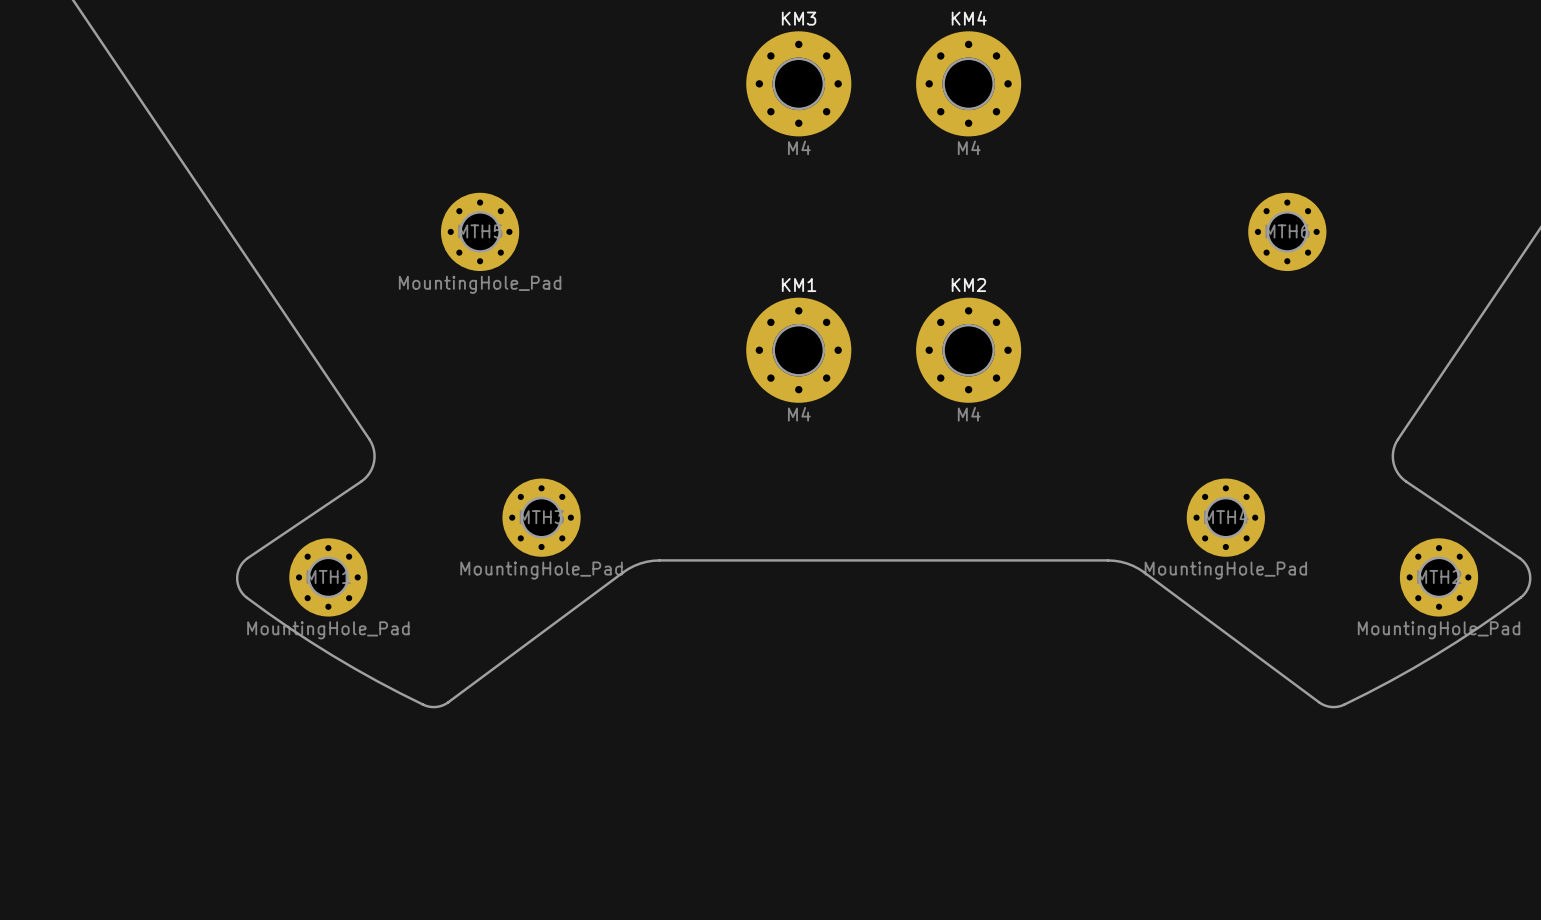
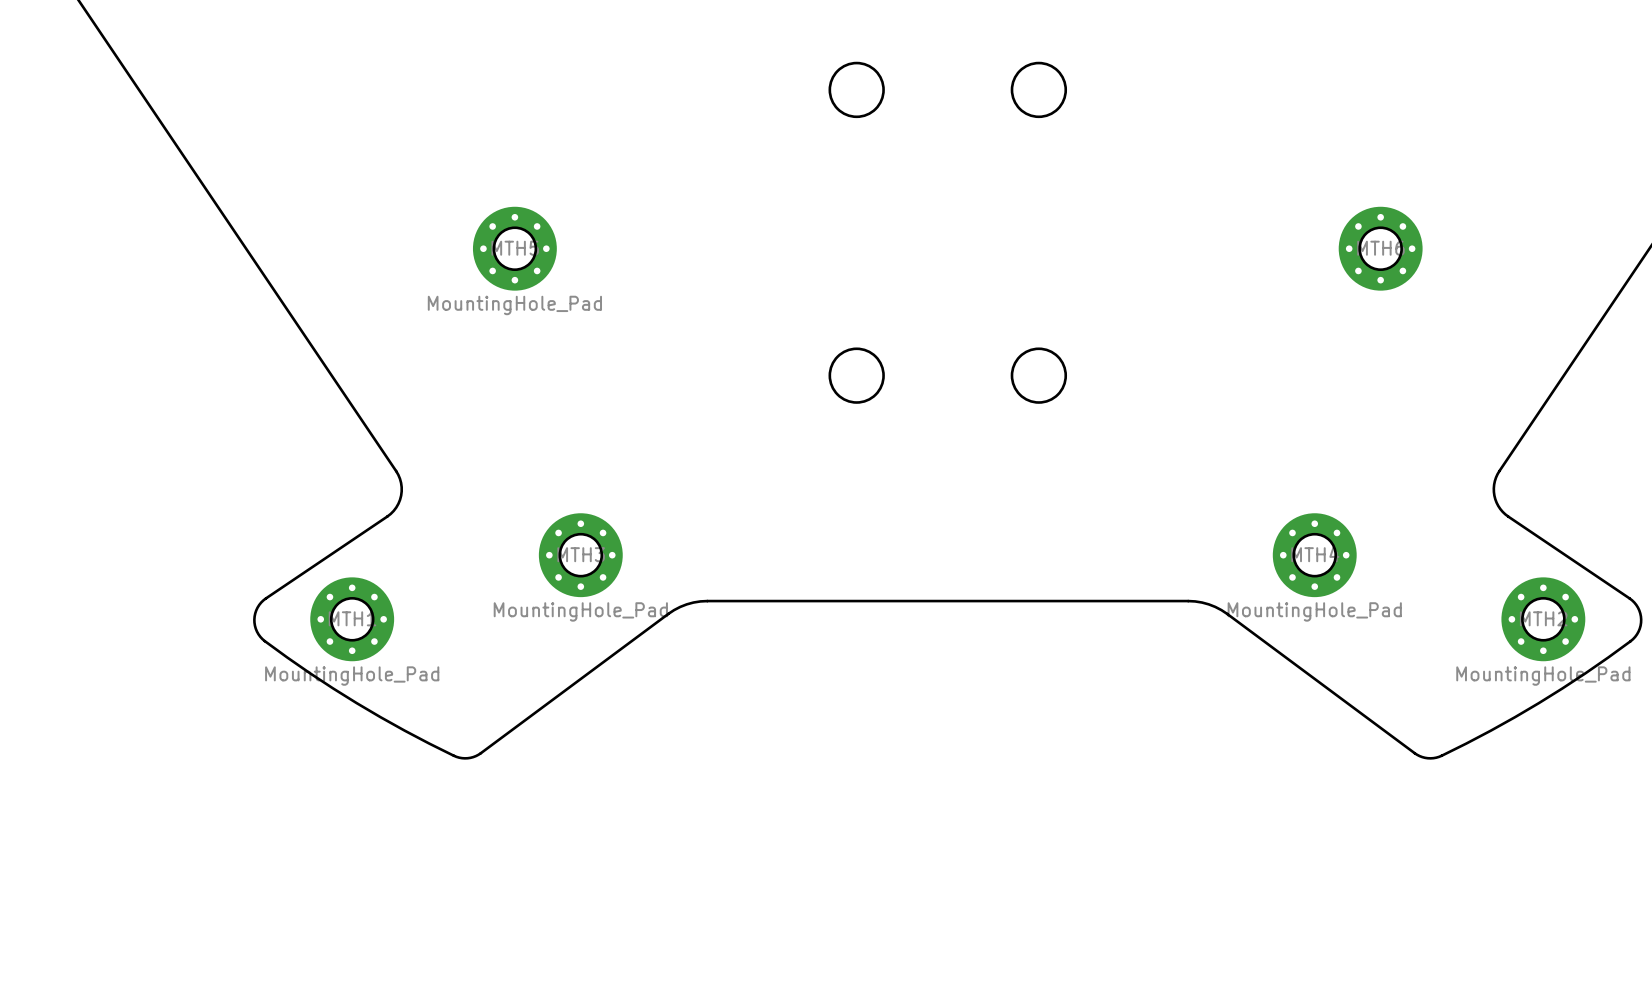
KM3: M4 (798, 83) -> none
KM4: M4 (968, 83) -> none
KM1: M4 (798, 350) -> none
KM2: M4 (968, 350) -> none

